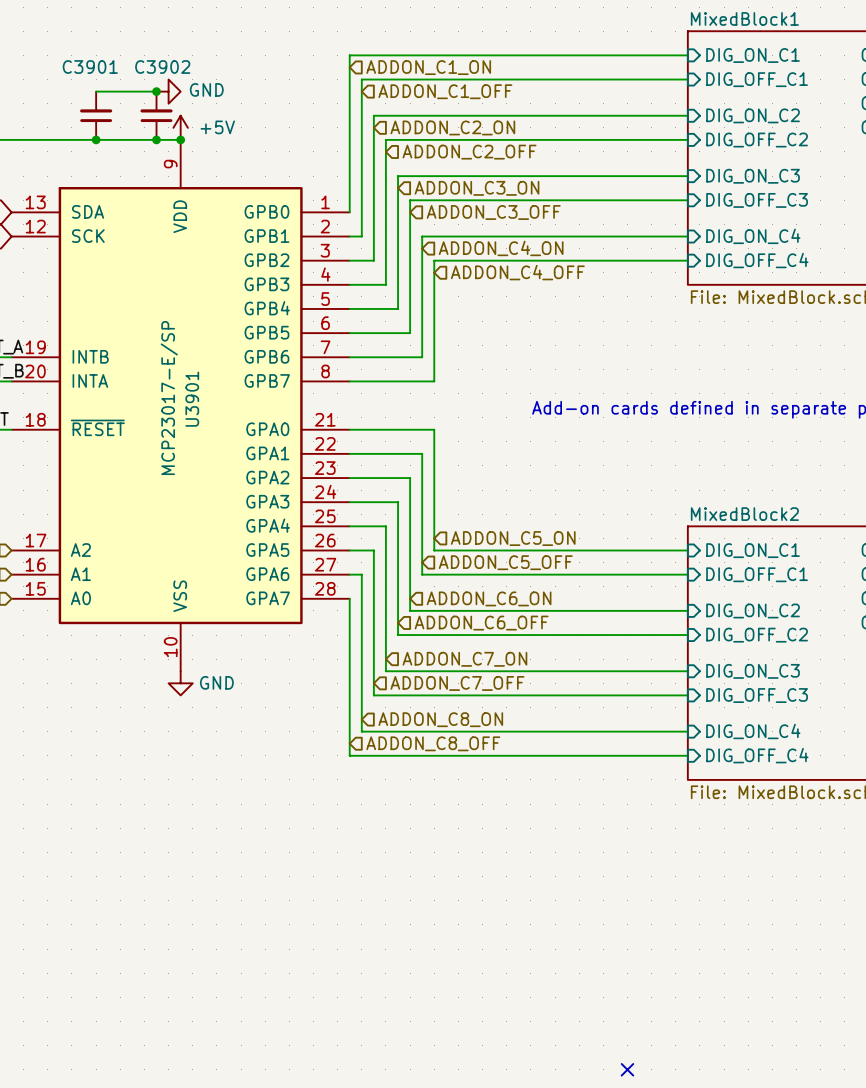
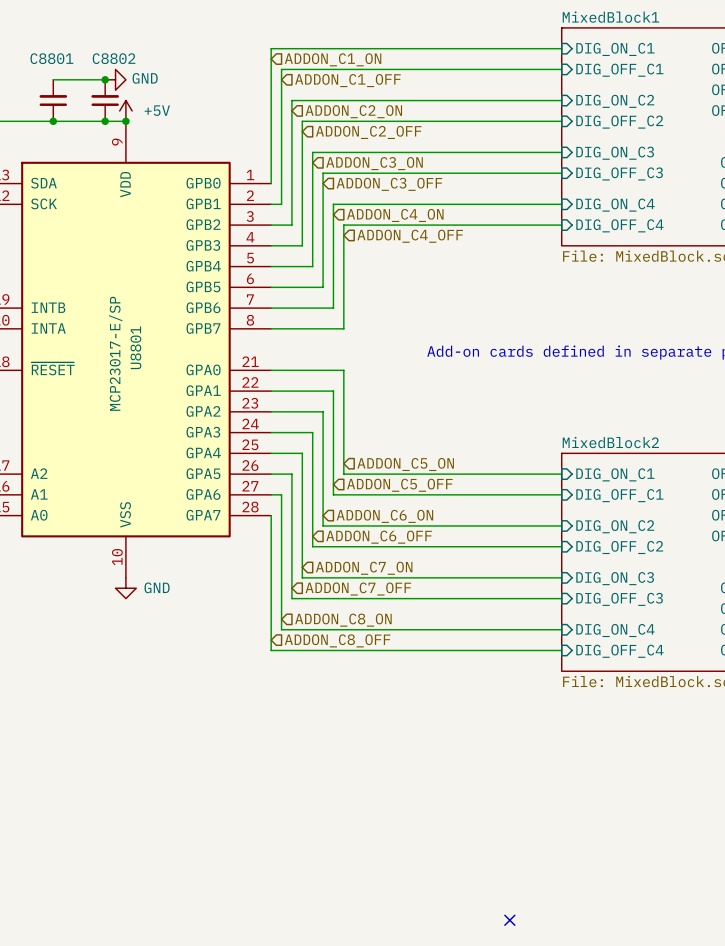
C3901 name: C3901 (90, 67) -> C8801 (51, 58)
C3902 name: C3902 (162, 67) -> C8802 (114, 58)
U3901 name: U3901 (192, 399) -> U8801 (135, 347)

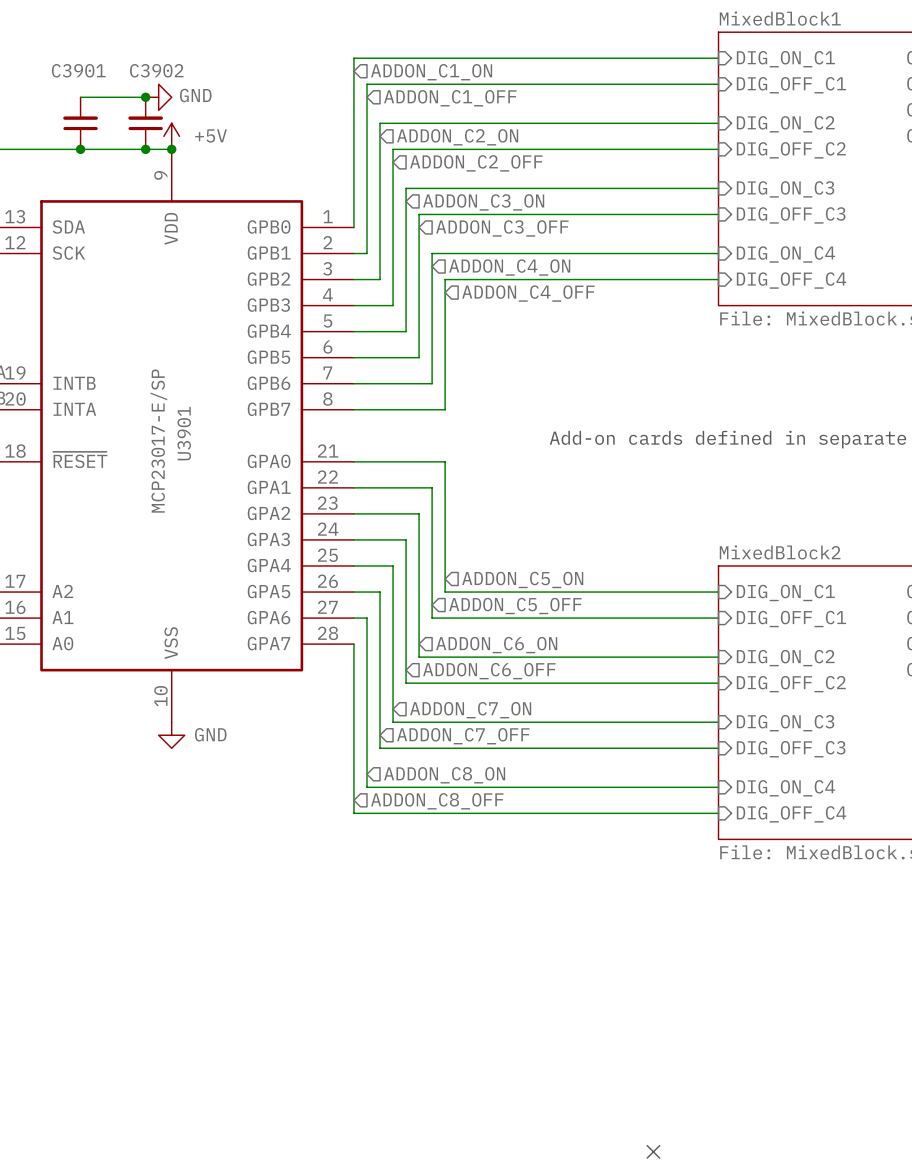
C8801 name: C8801 (51, 58) -> C3901 (78, 70)
C8802 name: C8802 (114, 58) -> C3902 (156, 70)
U8801 name: U8801 (135, 347) -> U3901 (184, 433)

